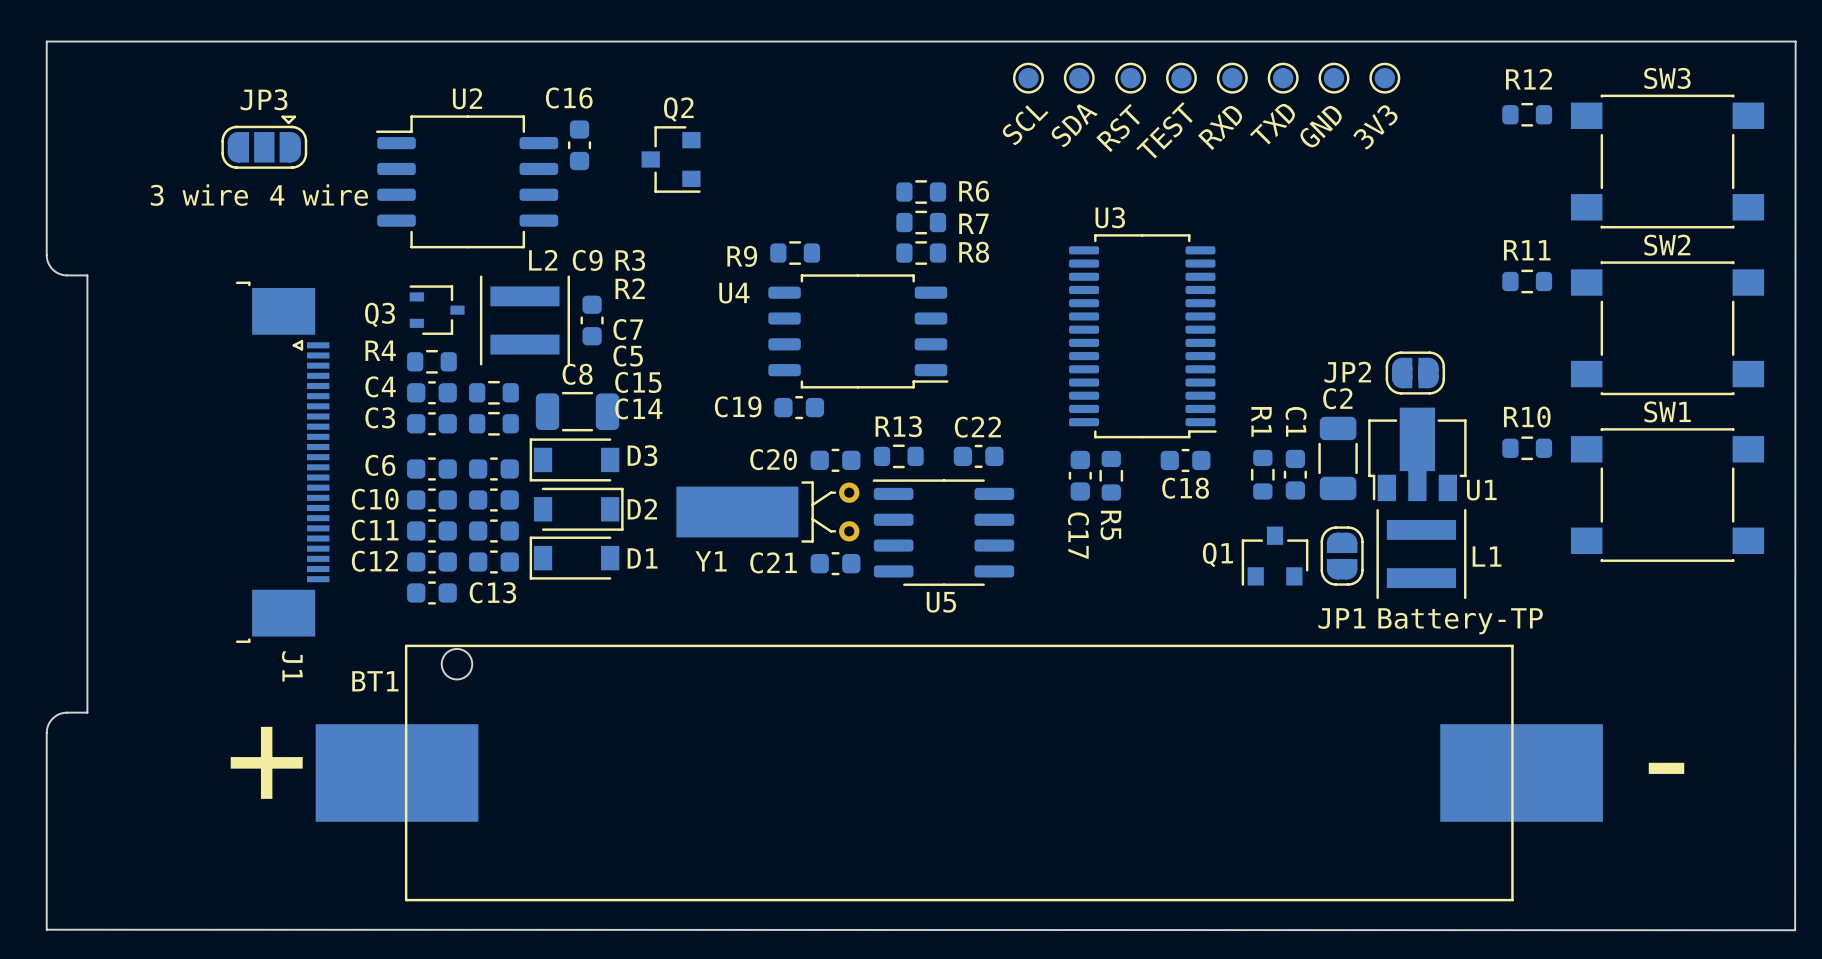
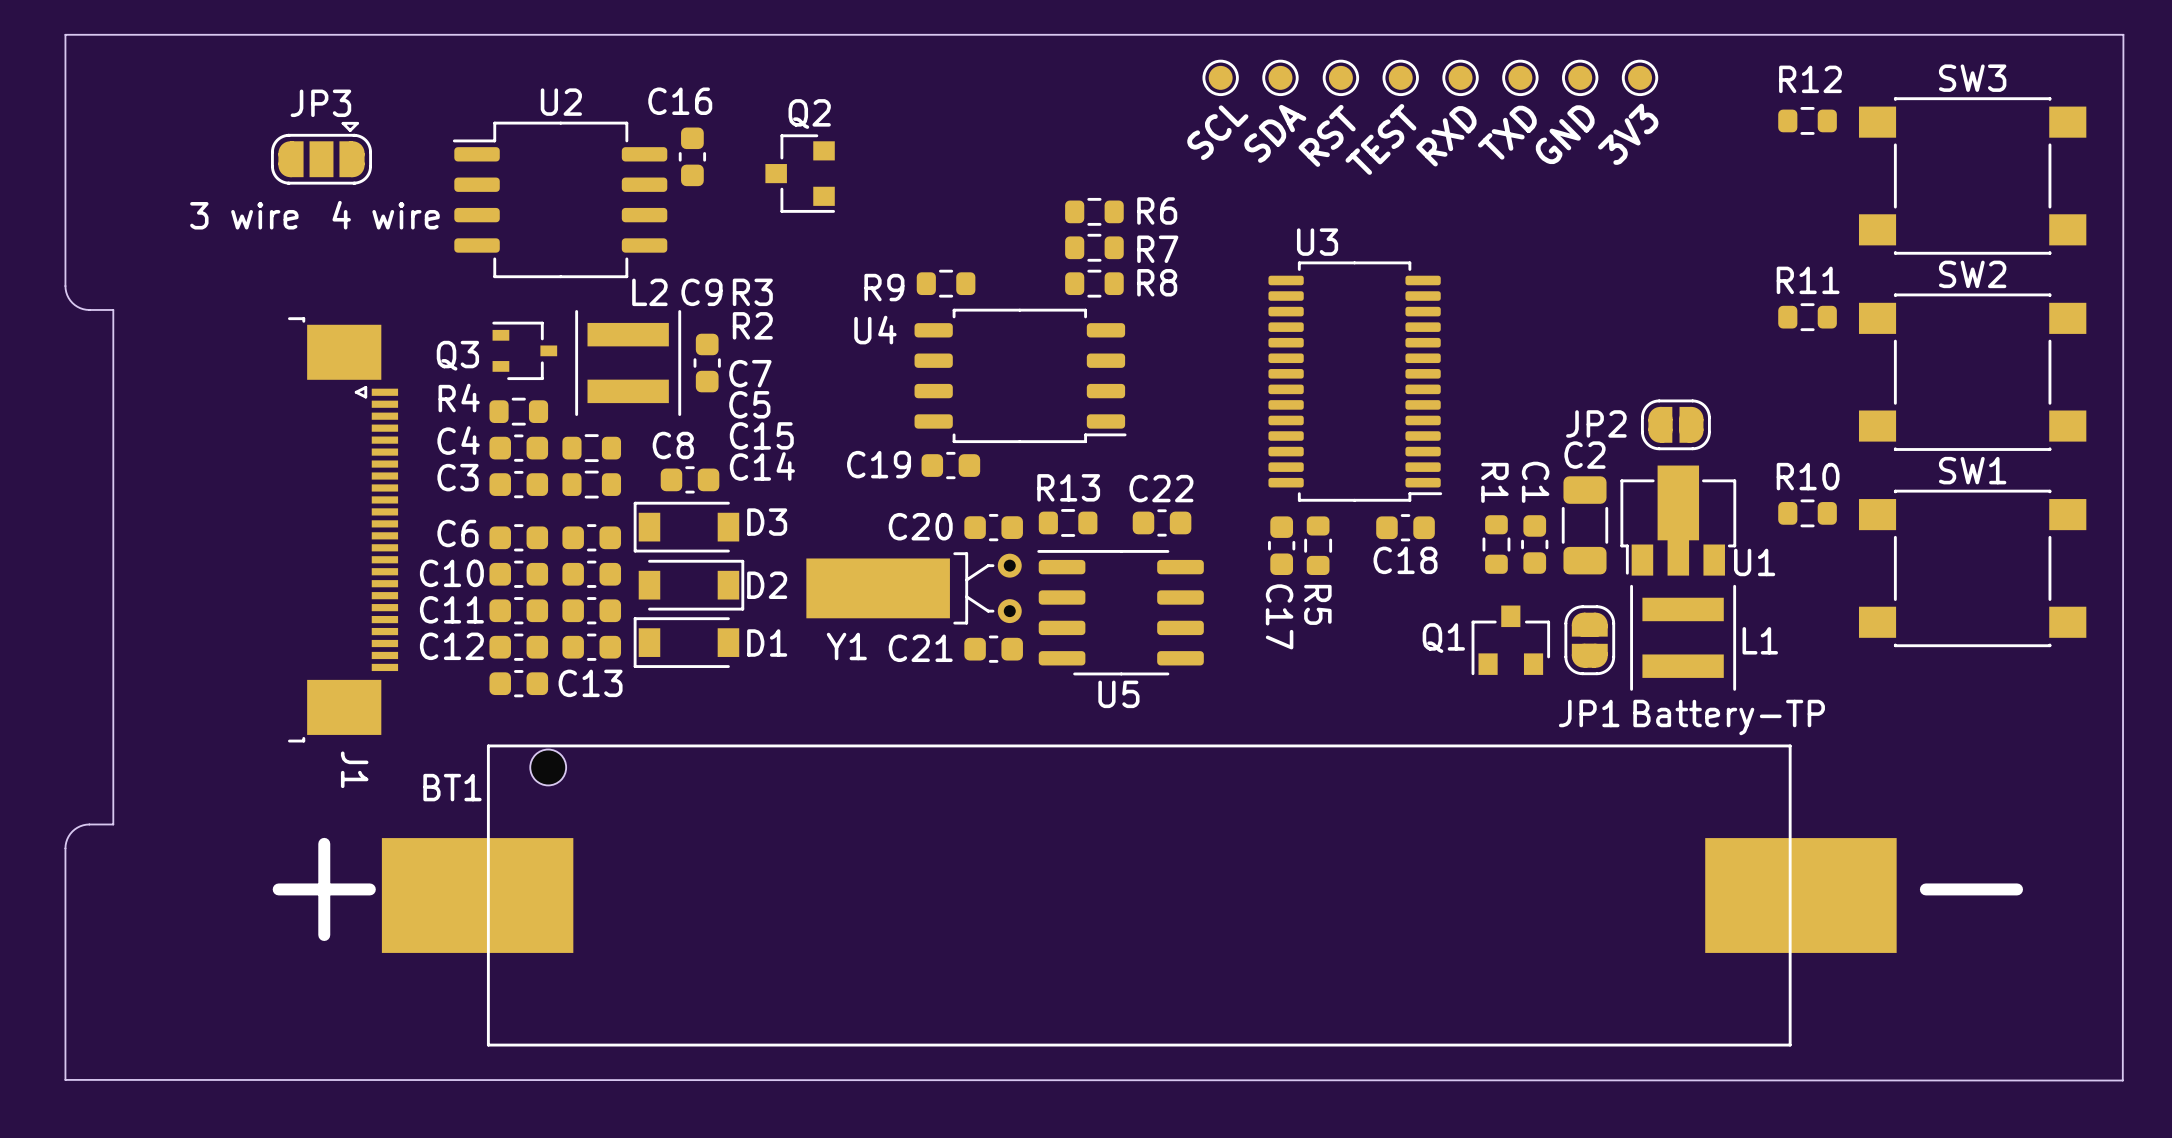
C8 footprint: [535, 391, 620, 432] -> [660, 466, 720, 494]

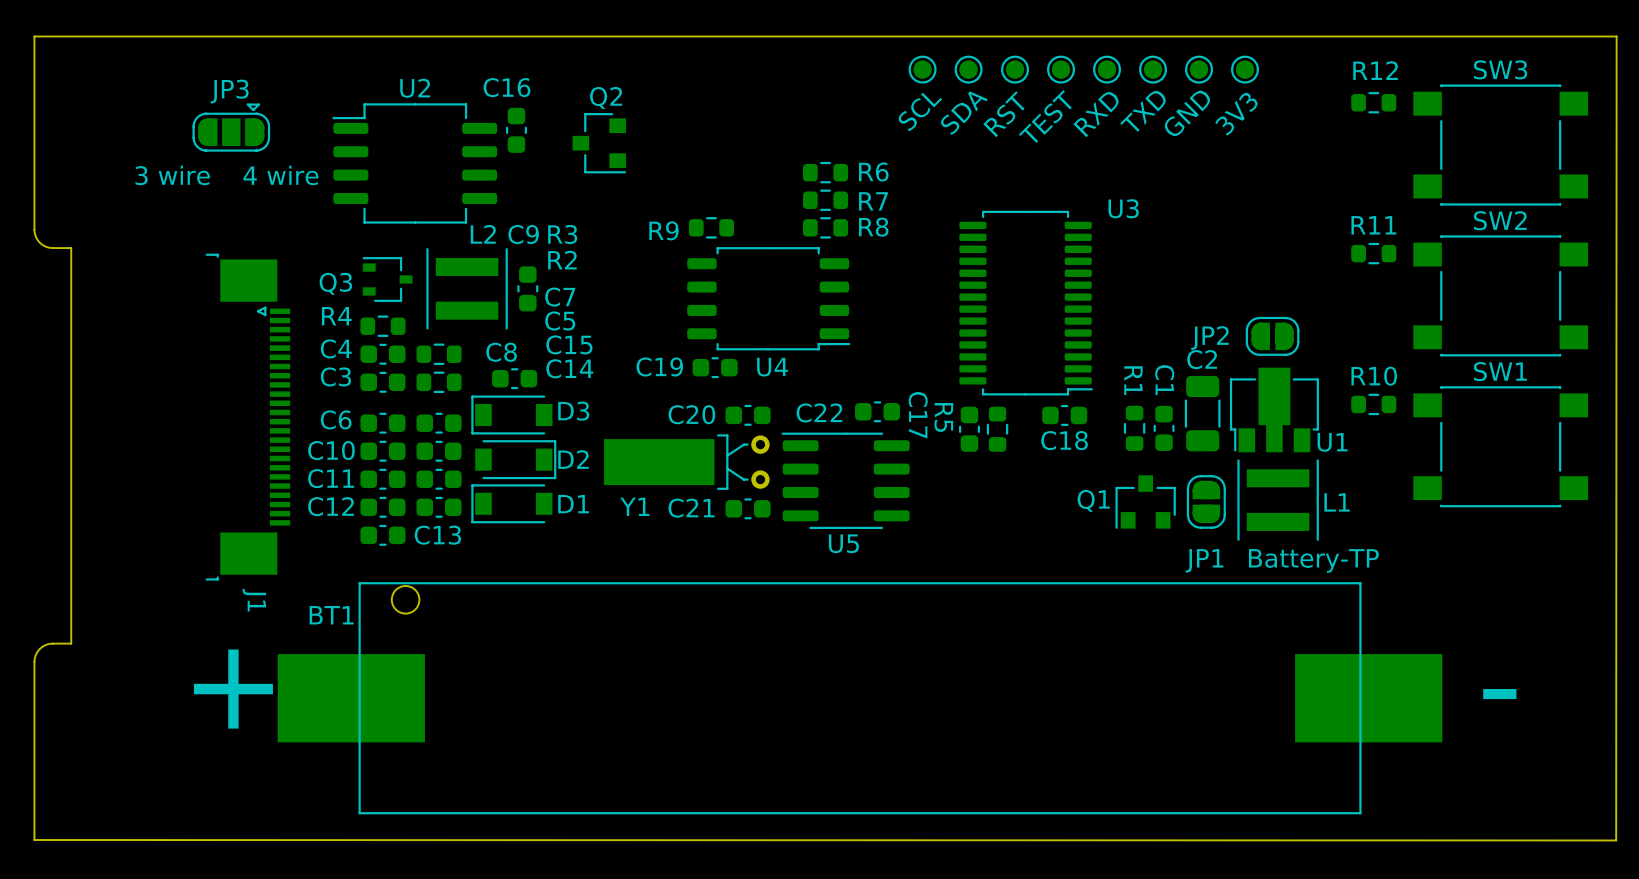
U3 name position: U3 (1317, 242) -> U3 (1123, 208)
U4 name position: U4 (875, 330) -> U4 (772, 367)
C22 name position: C22 (1161, 488) -> C22 (819, 412)
R13: (1068, 522) -> none
R5 name position: R5 (1317, 604) -> R5 (943, 417)
C17 name position: C17 (1279, 616) -> C17 (918, 415)

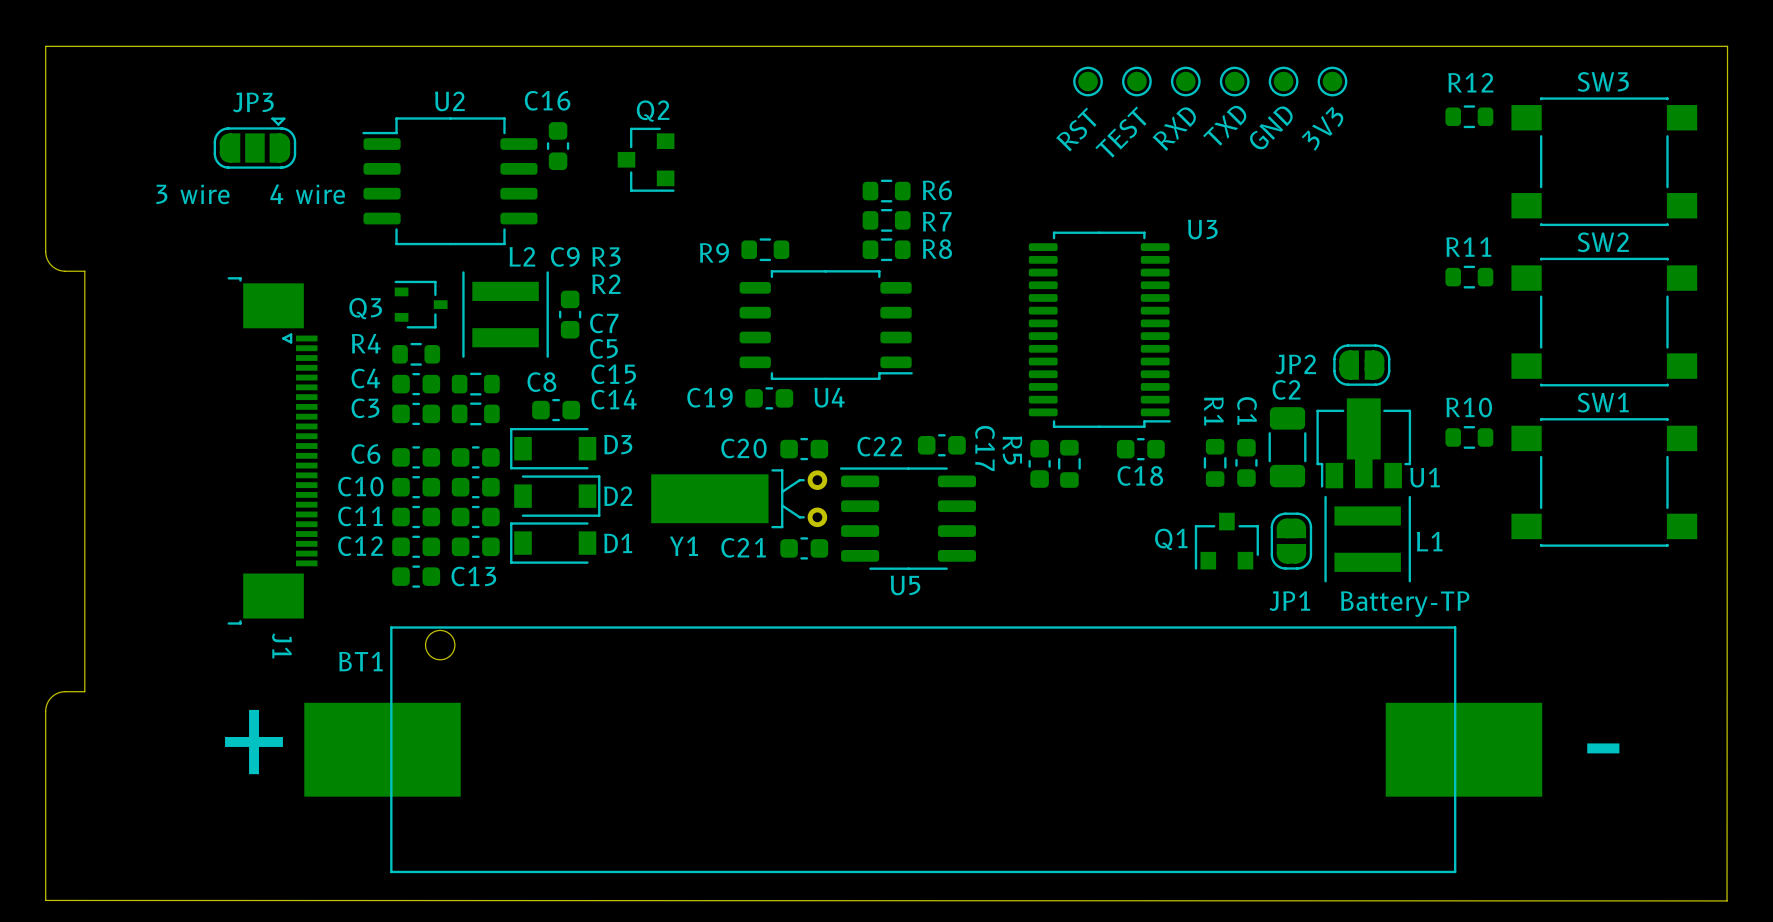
part: (922, 69) -> none
part: (968, 69) -> none
text: SCL (920, 111) -> none
text: SDA (964, 113) -> none

